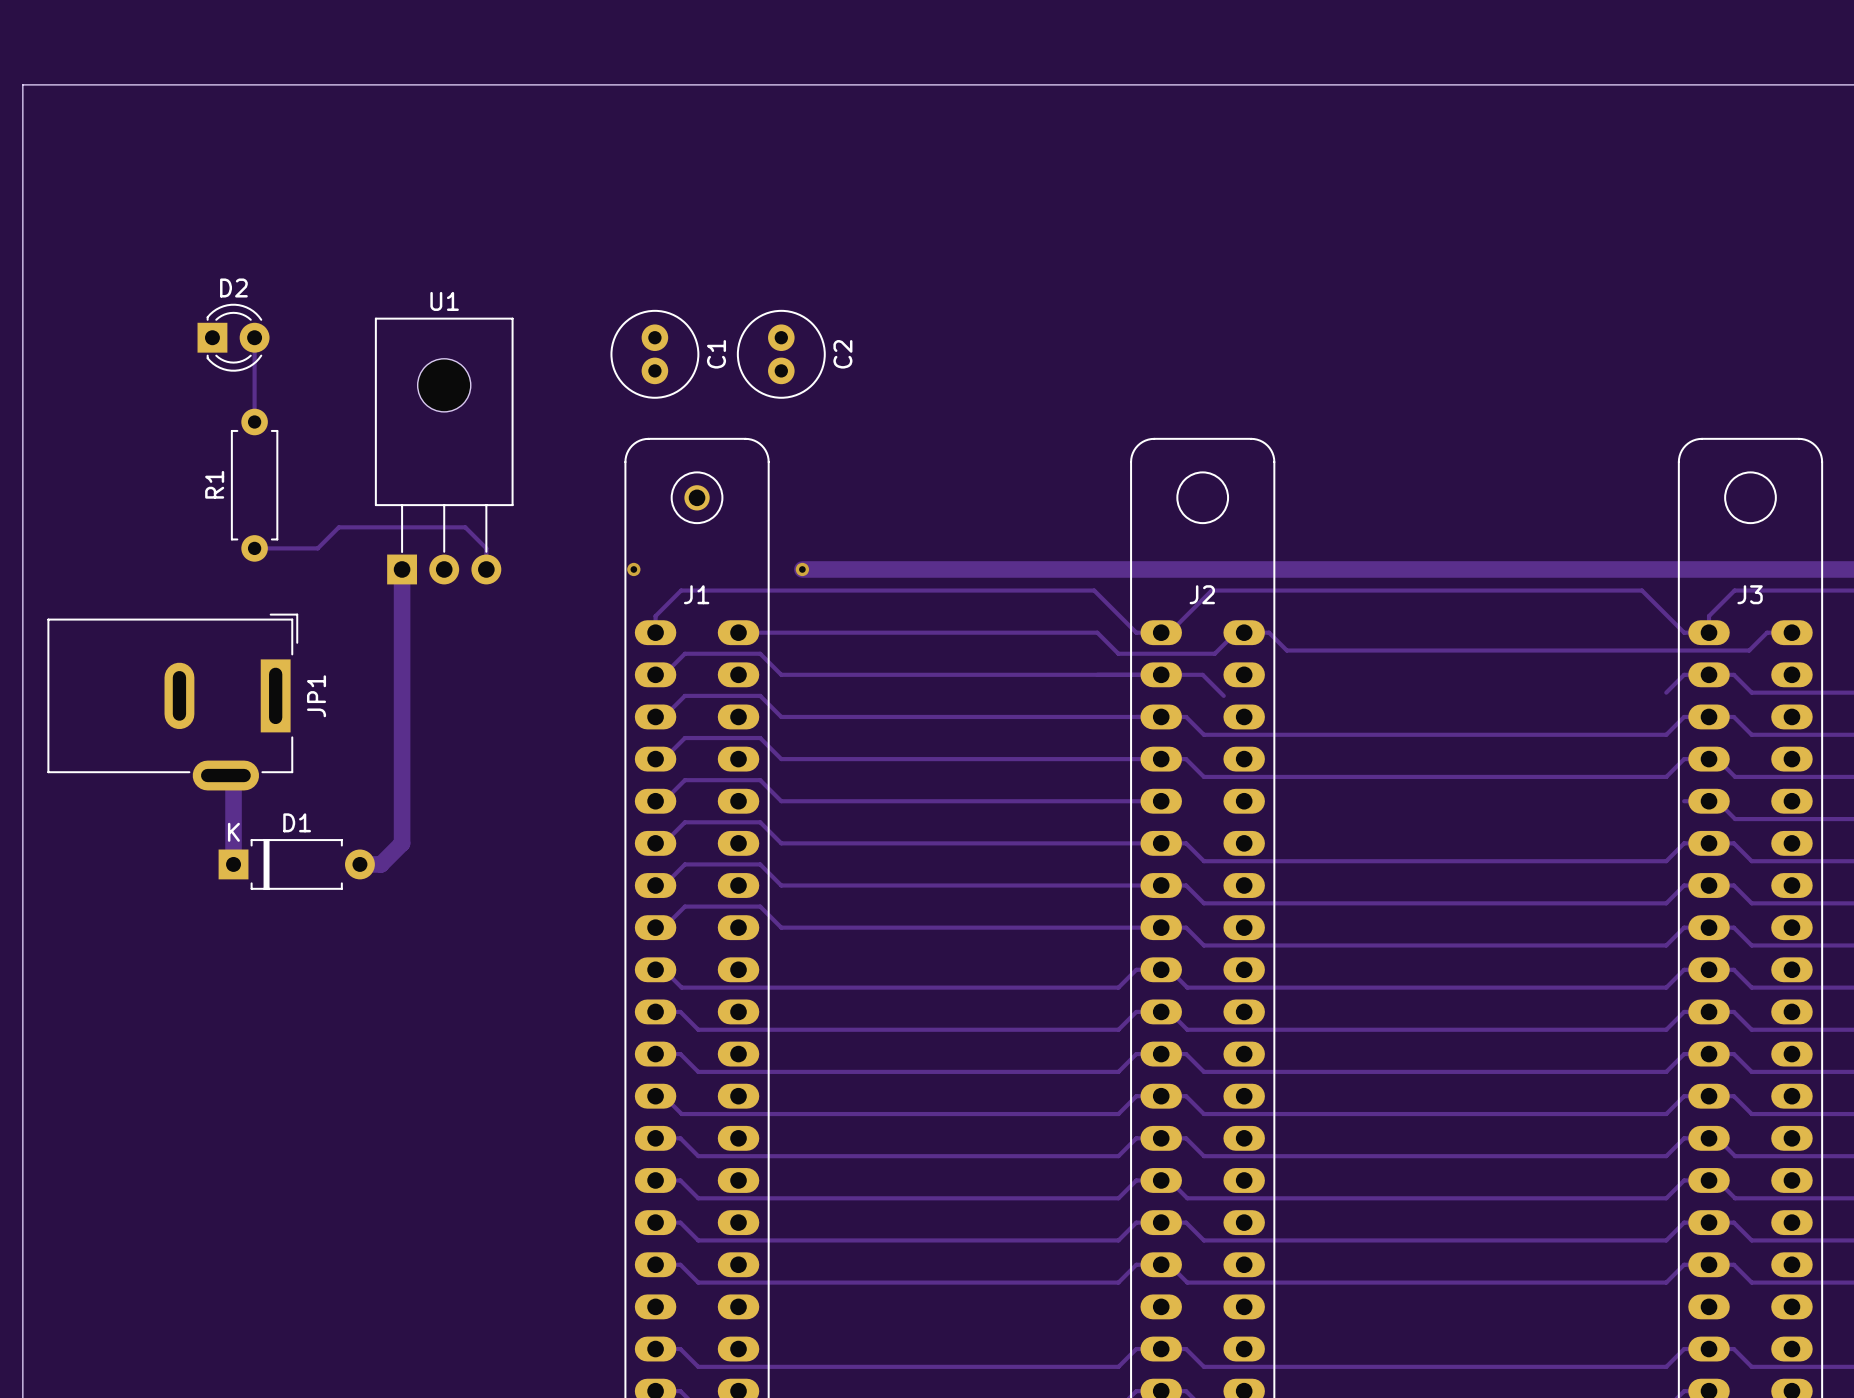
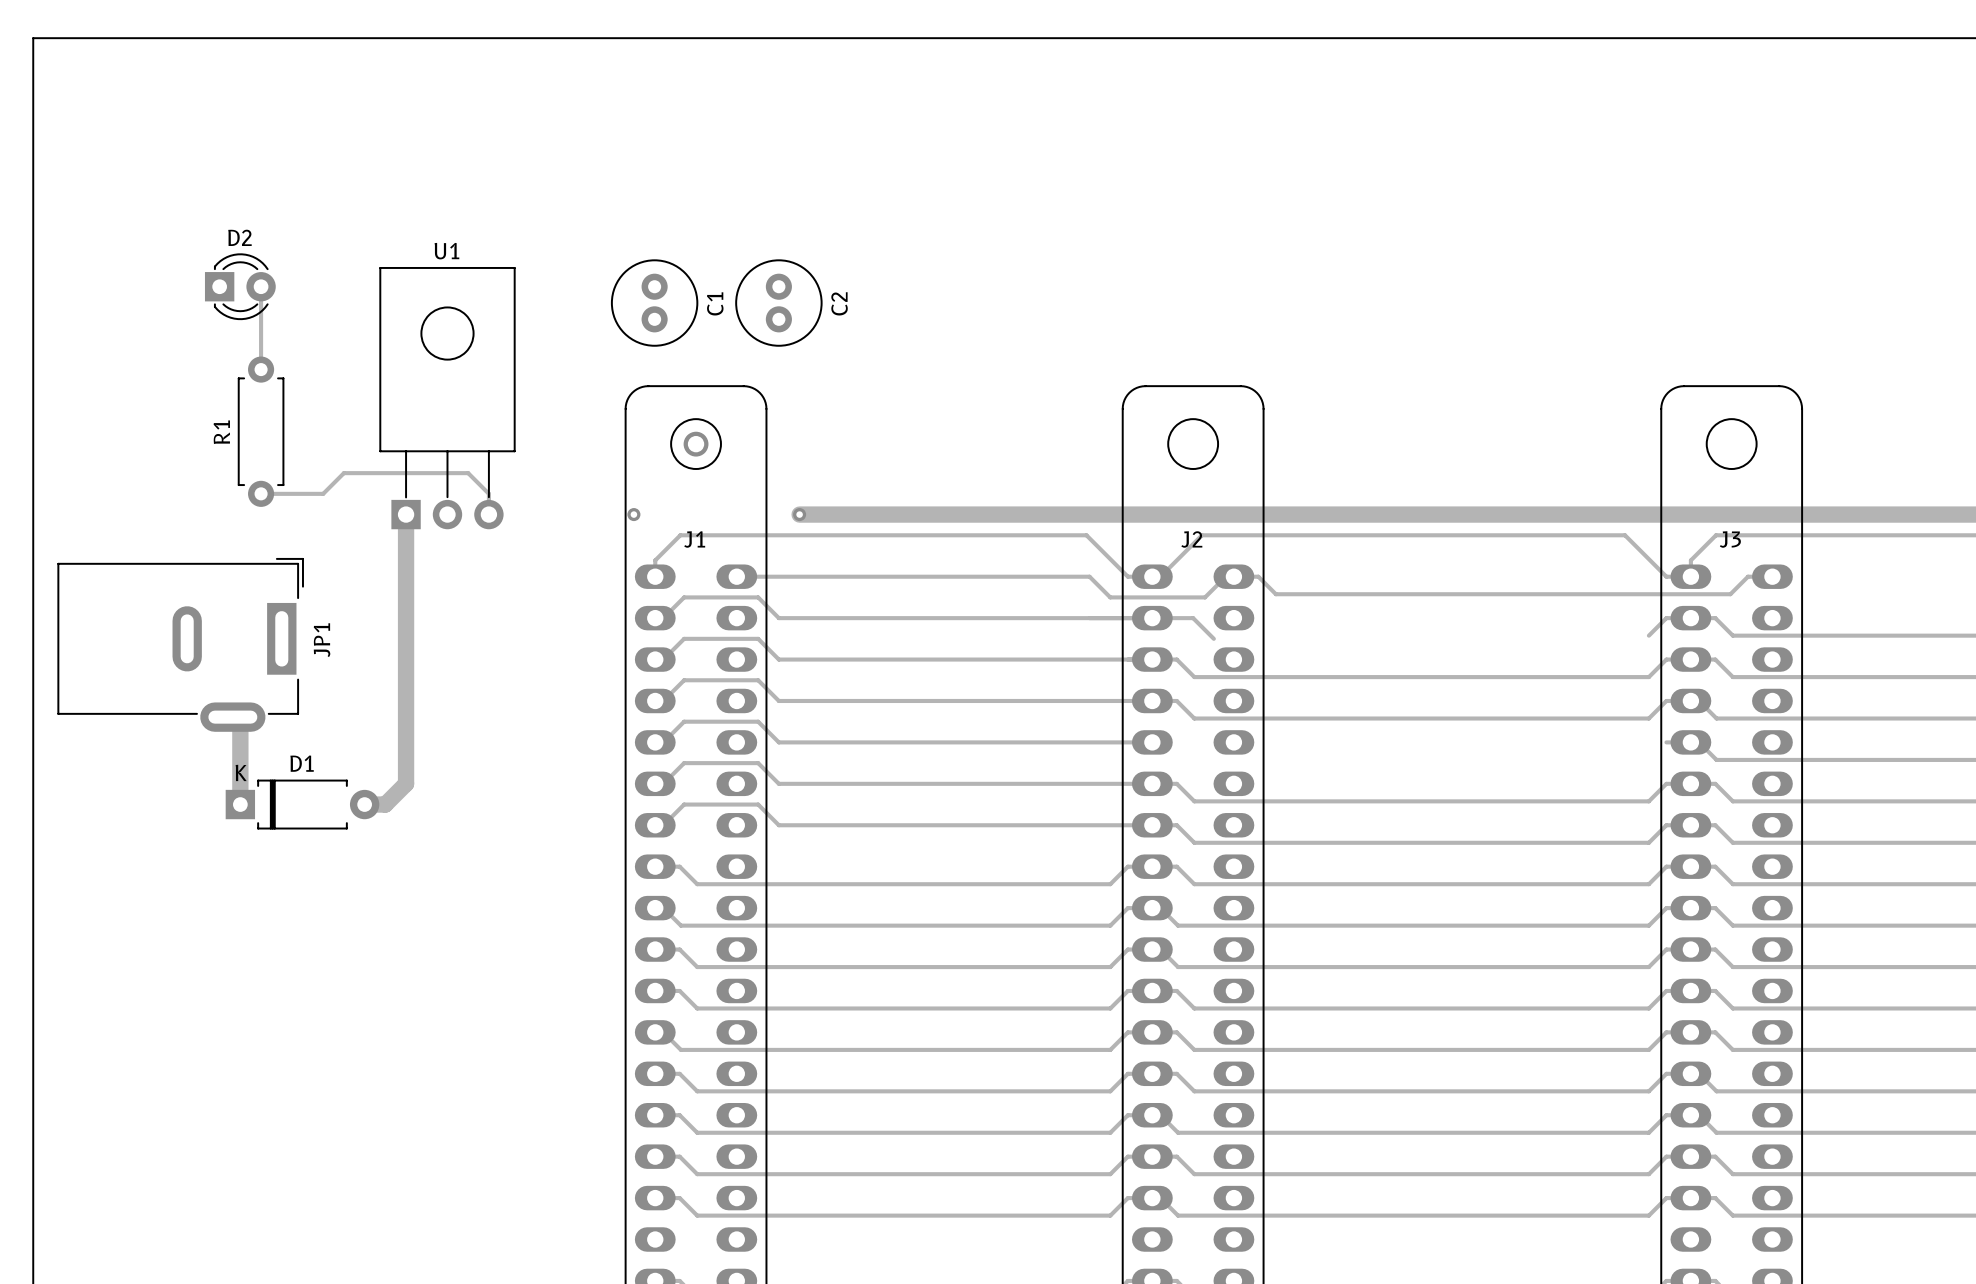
track: (663, 927) (684, 906) (760, 906) (781, 927) (1136, 927) -> (663, 866) (679, 866) (697, 884) (1110, 884) (1127, 866)

